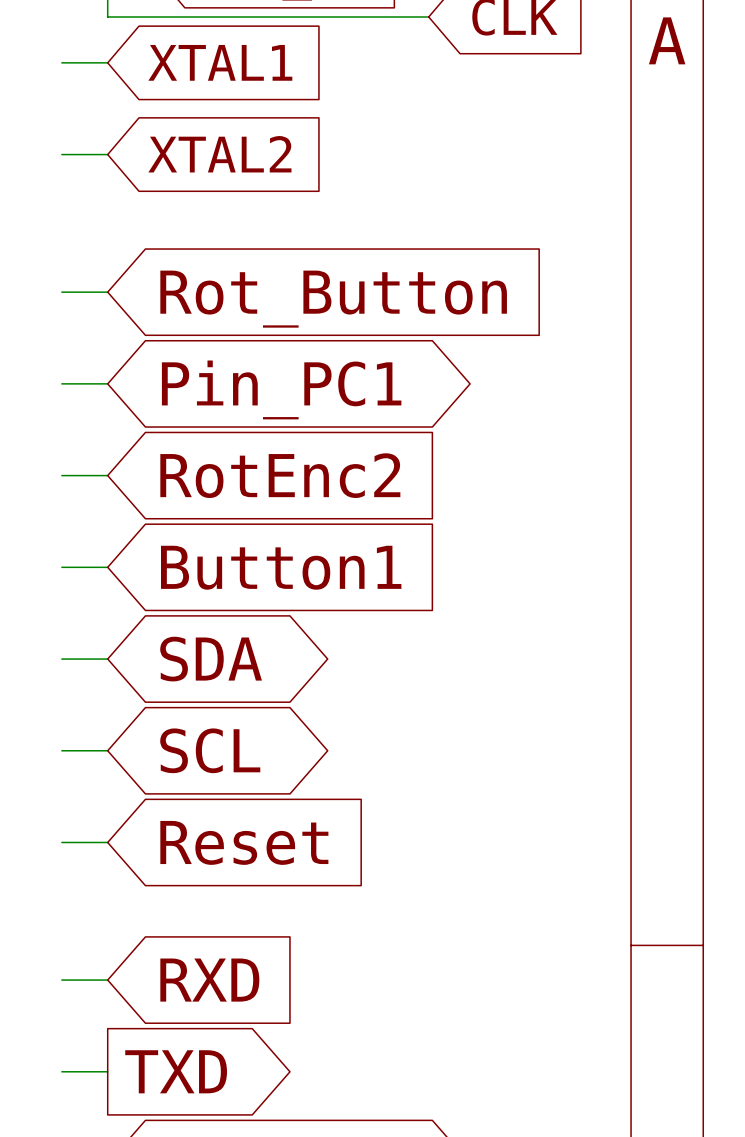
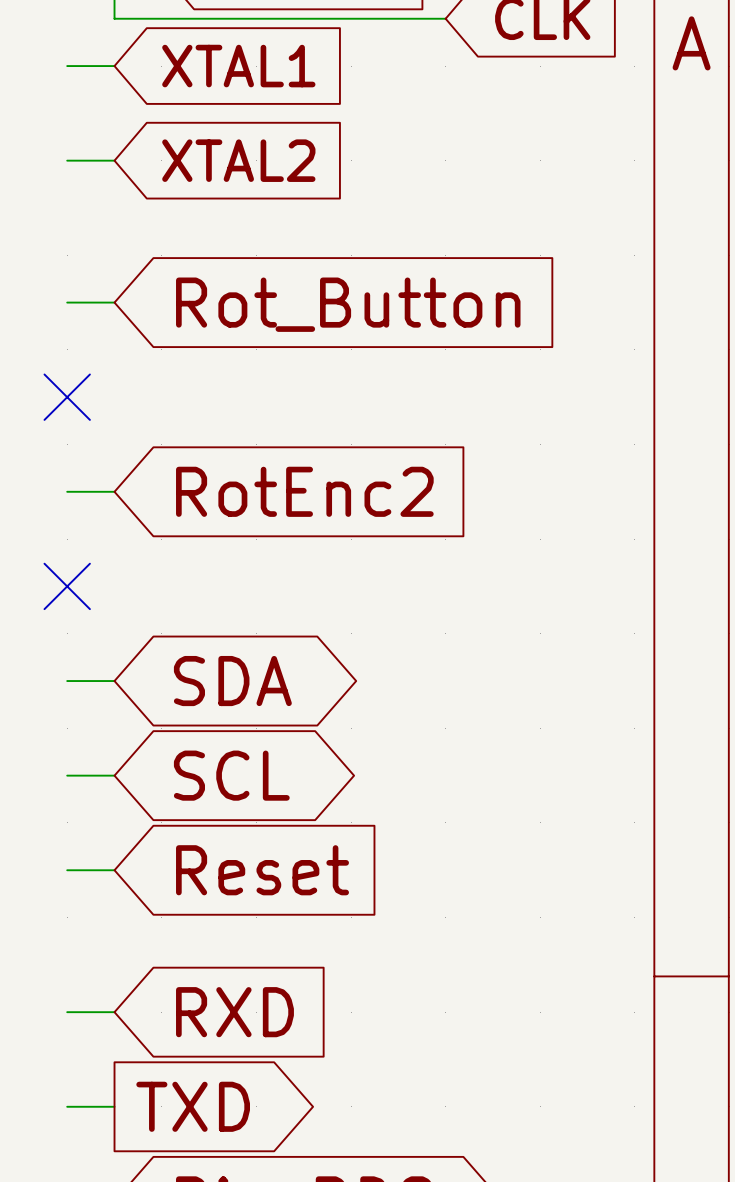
wire: (61, 383) (107, 383) -> none
no-connect mark: none -> (67, 397)
global label: Pin_PC1 (281, 389) -> none
wire: (61, 567) (107, 567) -> none
no-connect mark: none -> (67, 586)
global label: Button1 (281, 567) -> none

